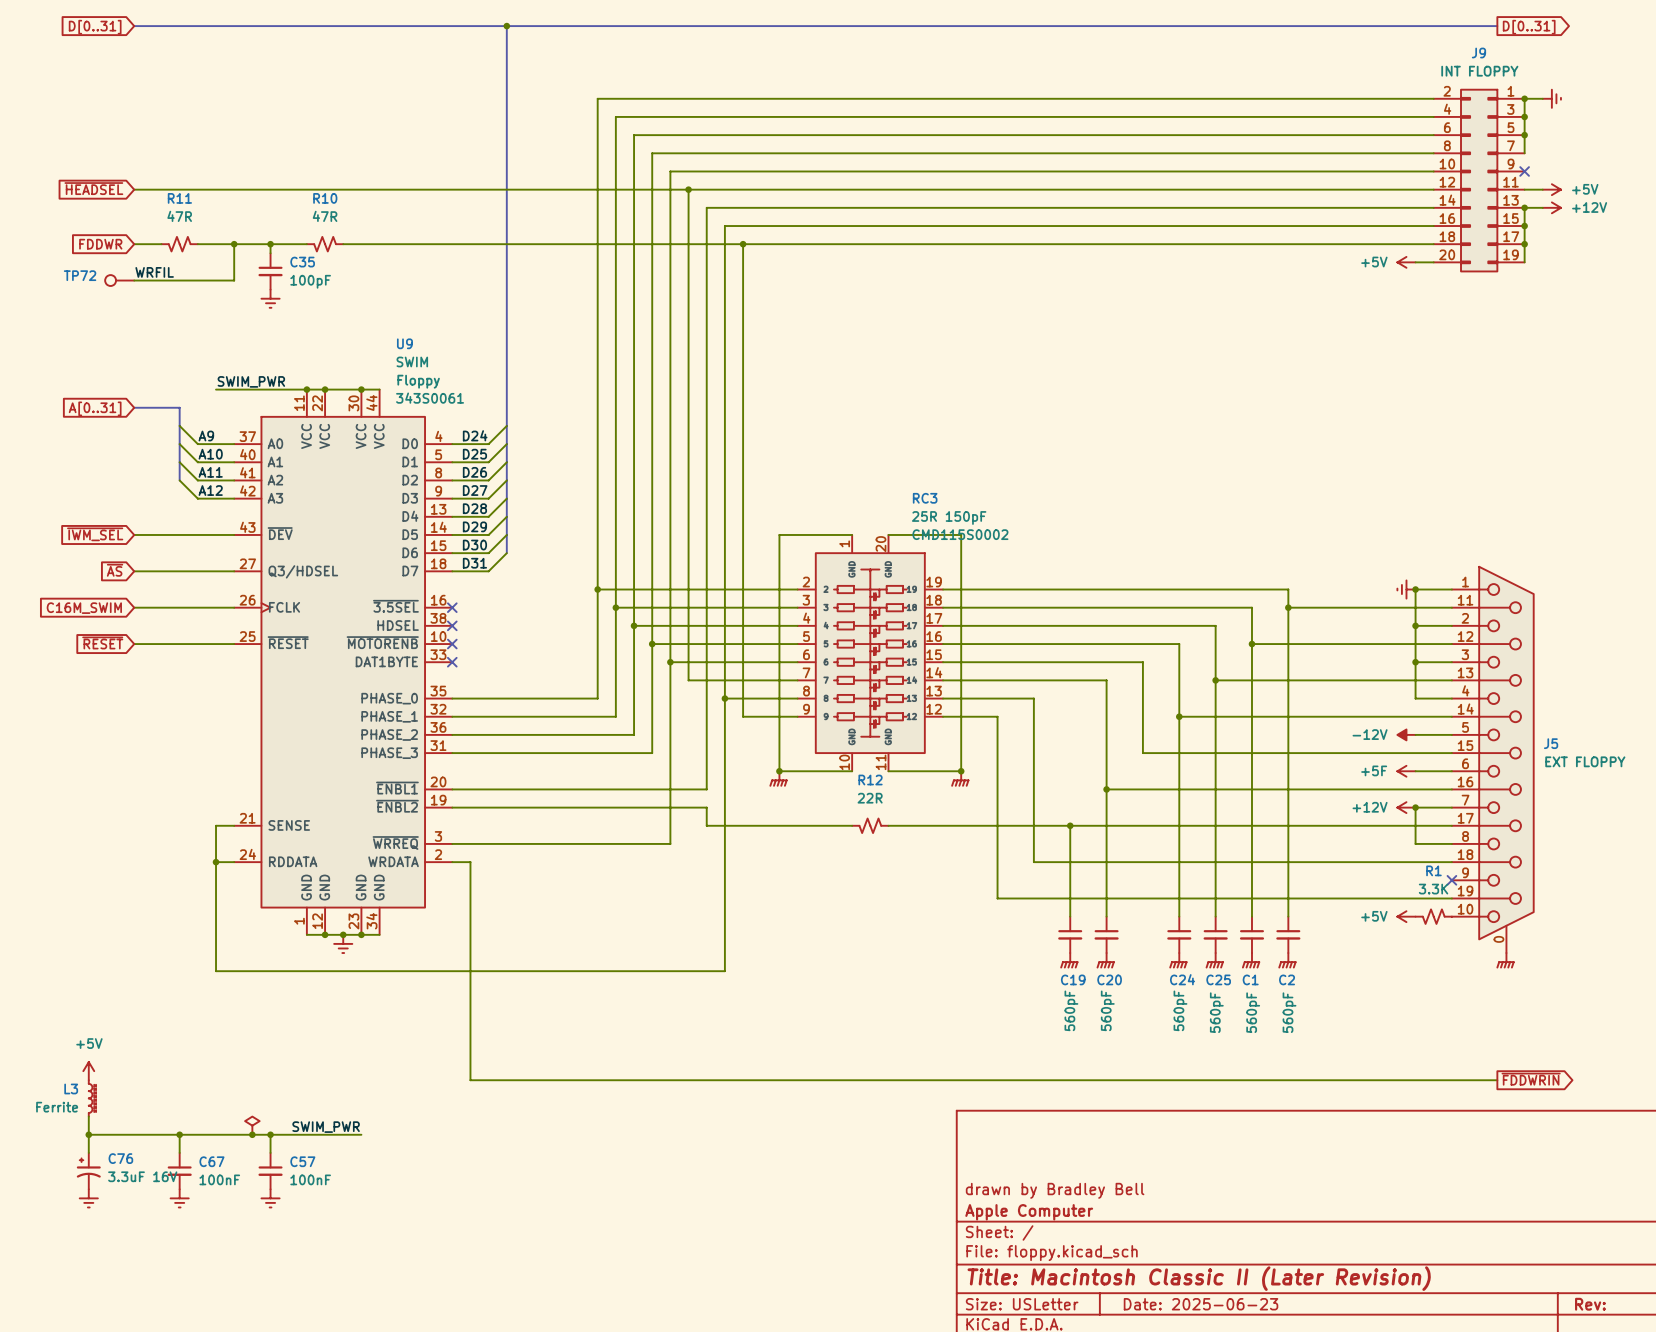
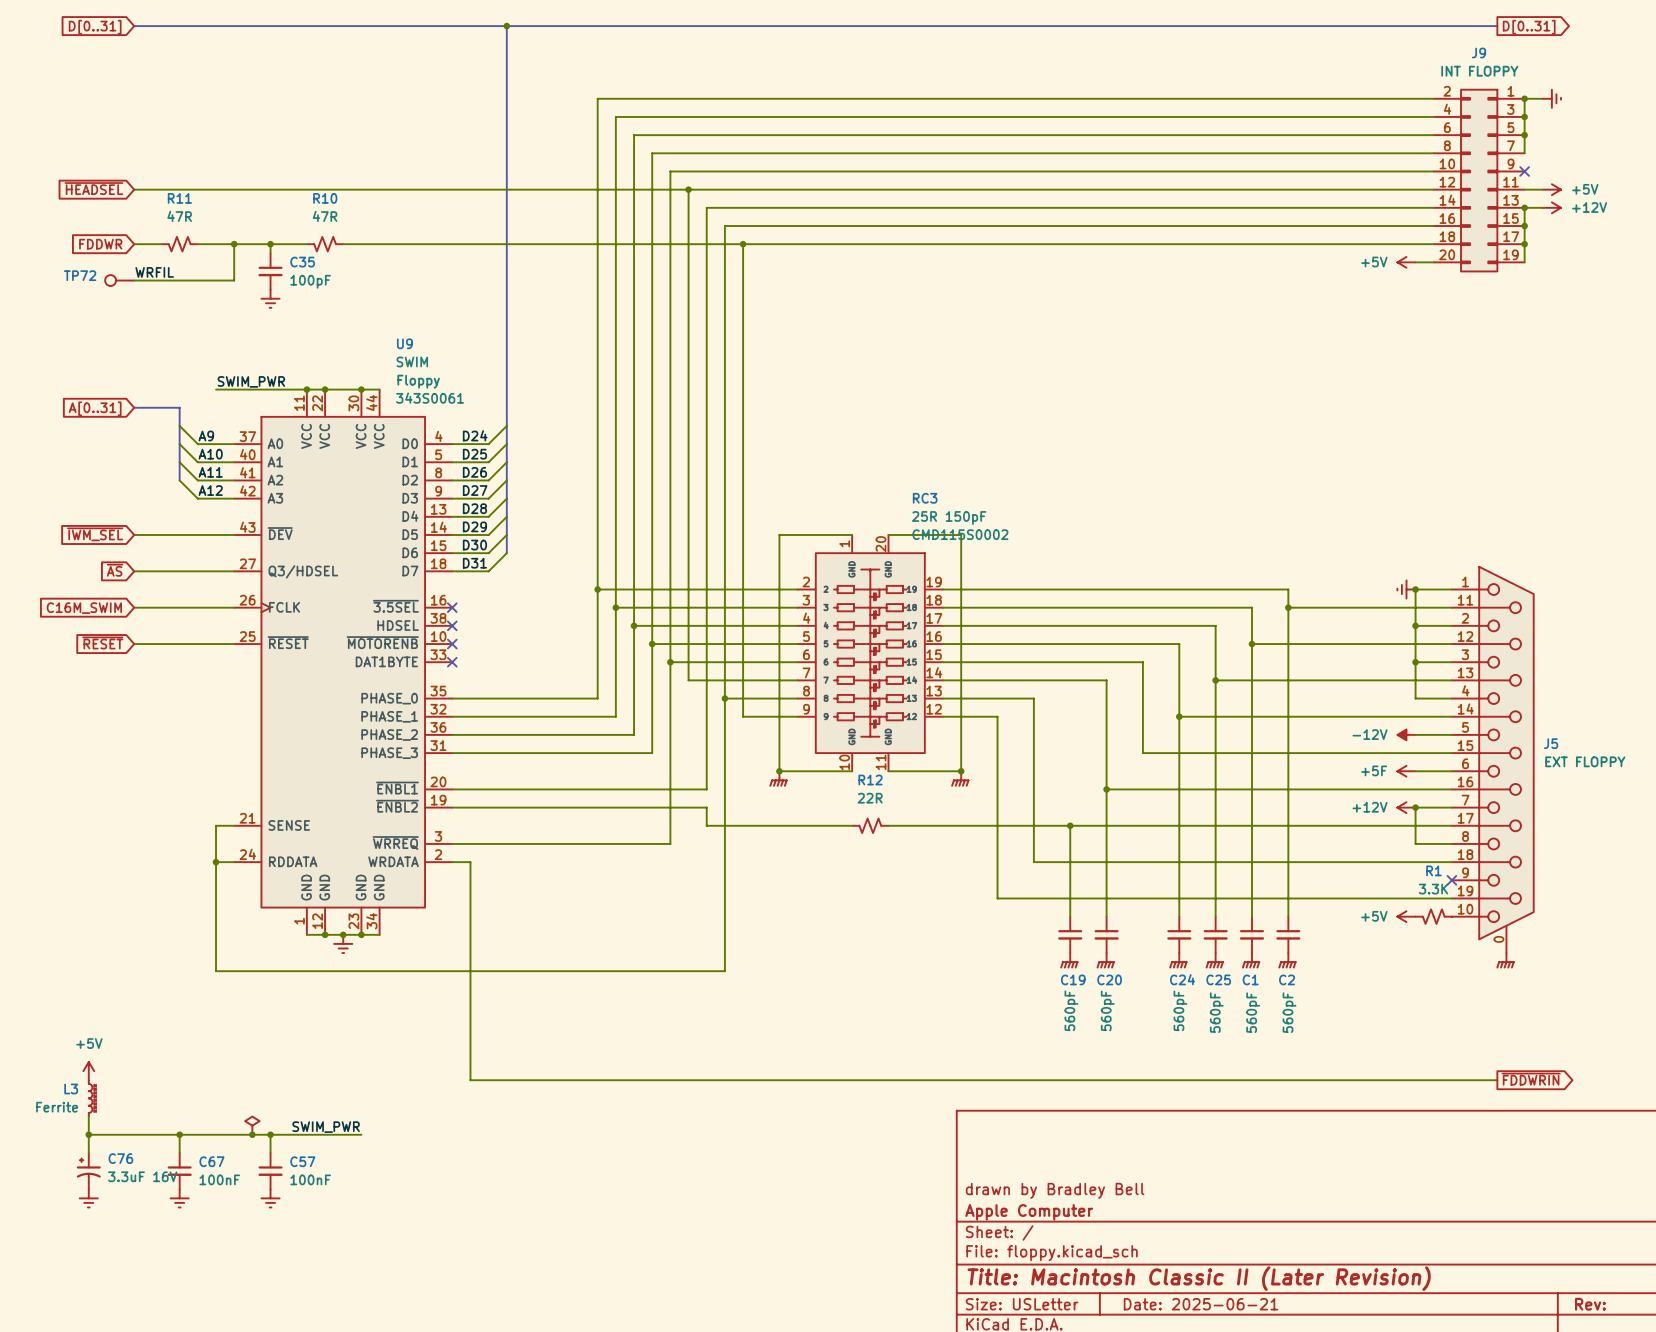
title block: Date: 2025-06-23 (1201, 1304) -> Date: 2025-06-21 (1201, 1304)

